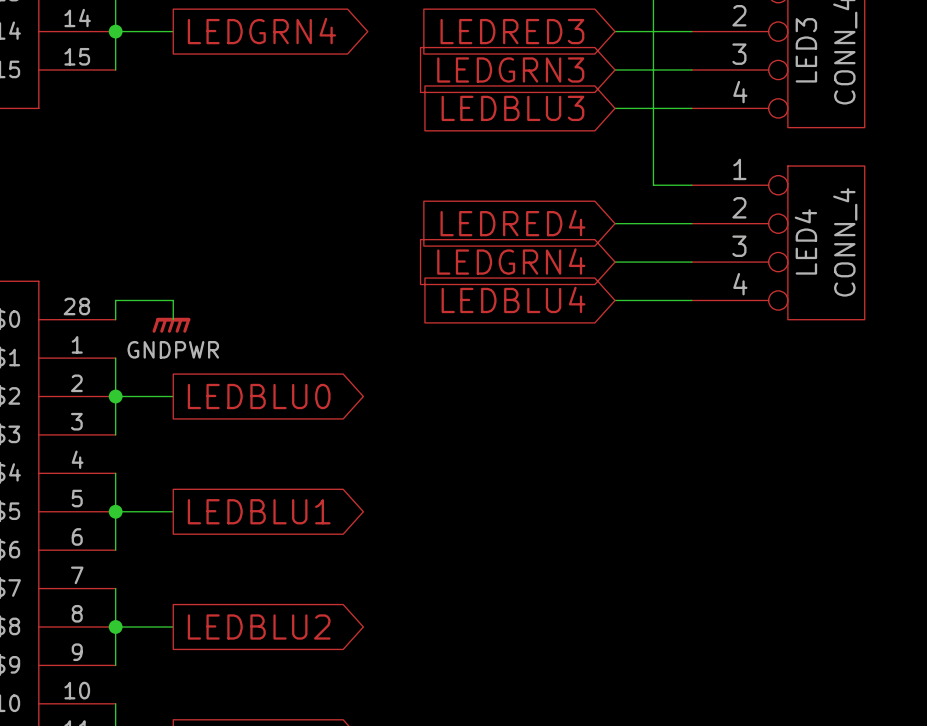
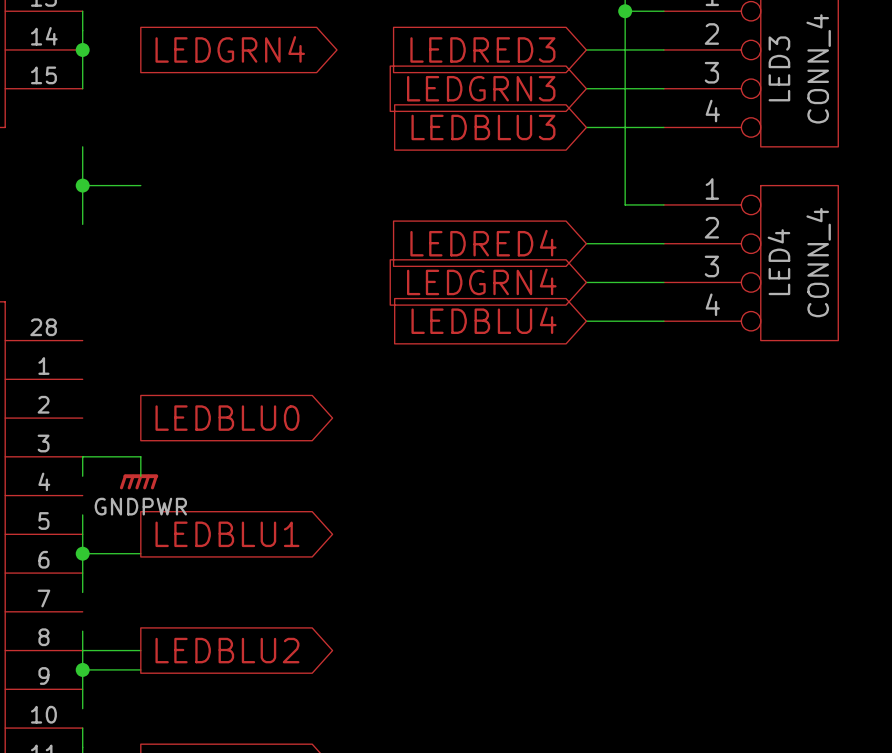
wire: (115, 31) (173, 31) -> (82, 185) (140, 185)
junction: none -> (82, 185)
wire: (115, 319) (115, 300) (173, 300) (173, 319) -> (82, 476) (82, 456) (140, 456) (140, 476)
power symbol position: GNDPWR (171, 325) -> GNDPWR (139, 481)
wire: (115, 358) (115, 434) -> (82, 146) (82, 224)
wire: (115, 396) (173, 396) -> (82, 553) (140, 553)
junction: (115, 396) -> none
wire: (115, 473) (115, 492) -> (82, 573) (82, 592)
wire: (115, 511) (173, 511) -> (82, 669) (140, 669)
junction position: (115, 511) -> (82, 553)
wire: (115, 588) (115, 607) -> (82, 689) (82, 708)
junction position: (115, 626) -> (82, 669)

